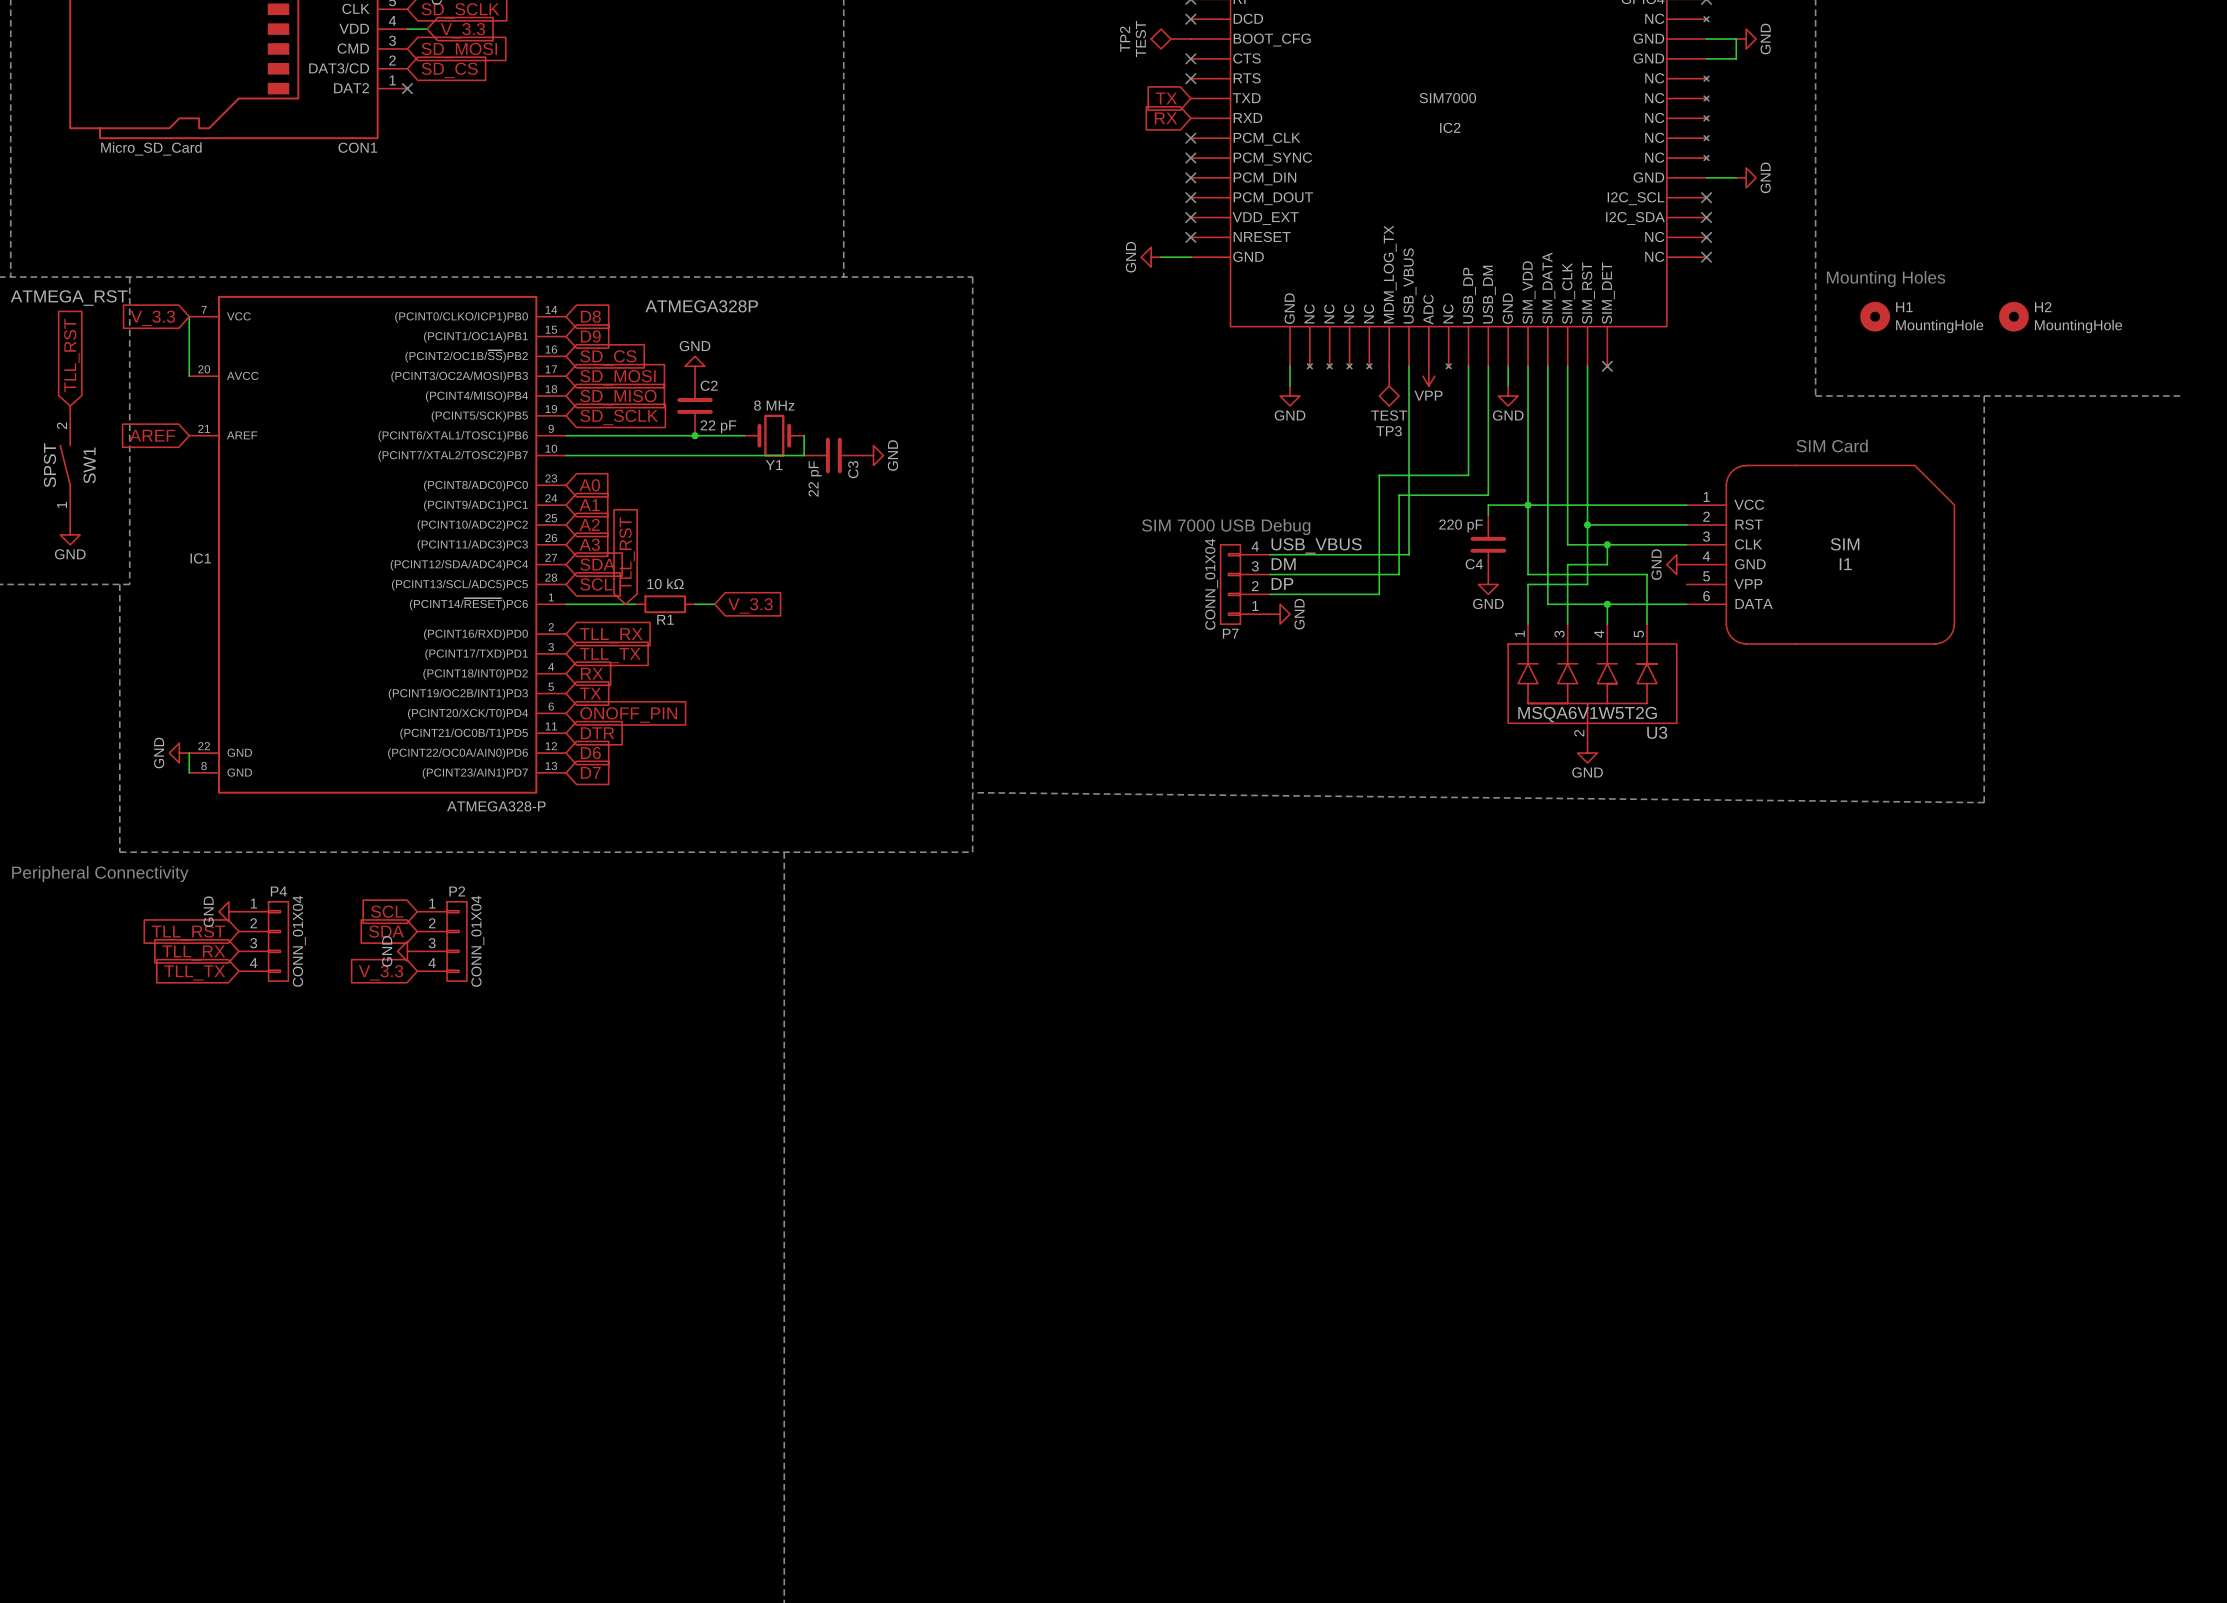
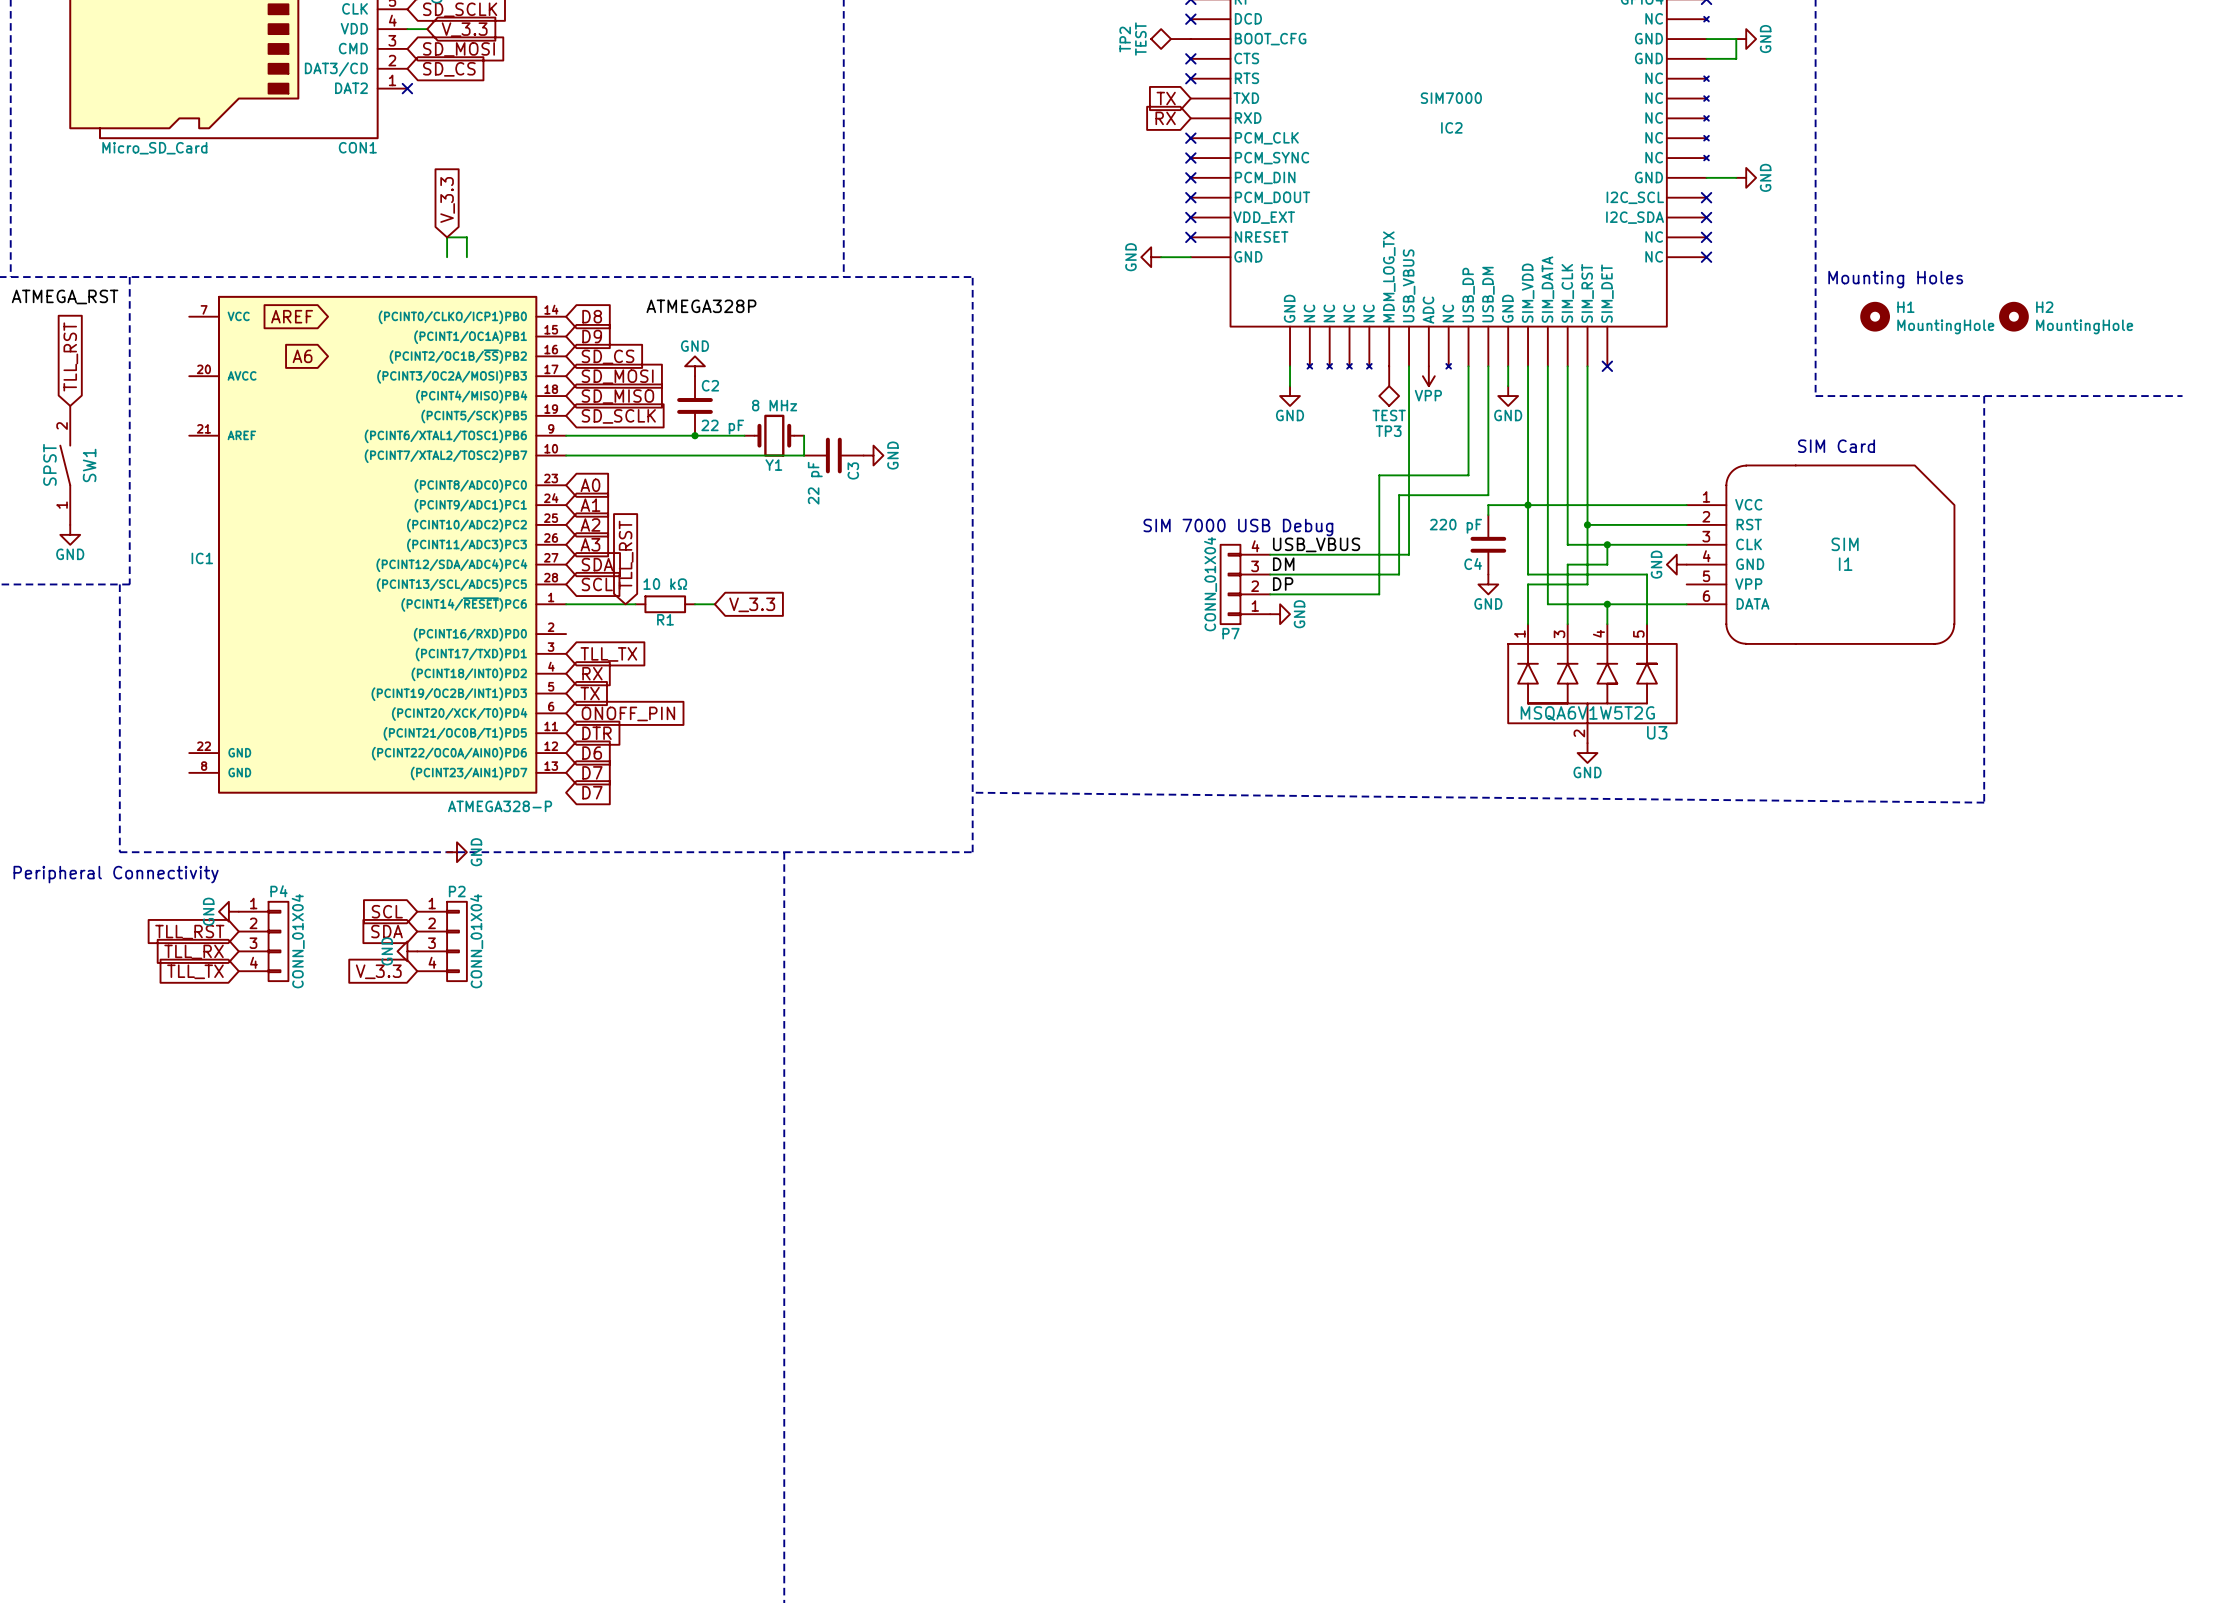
global label: none -> V_3.3 (447, 199)
wire: none -> (447, 257) (447, 237) (466, 237) (466, 257)
wire: (189, 316) (189, 376) -> none
global label: V_3.3 (152, 318) -> none
global label: none -> A6 (302, 356)
global label position: AREF (152, 435) -> AREF (292, 316)
global label: TLL_RX (611, 635) -> none
power symbol: GND (179, 753) -> none
wire: (189, 753) (189, 772) -> none
global label: none -> D7 (592, 792)
power symbol: none -> GND (456, 852)

